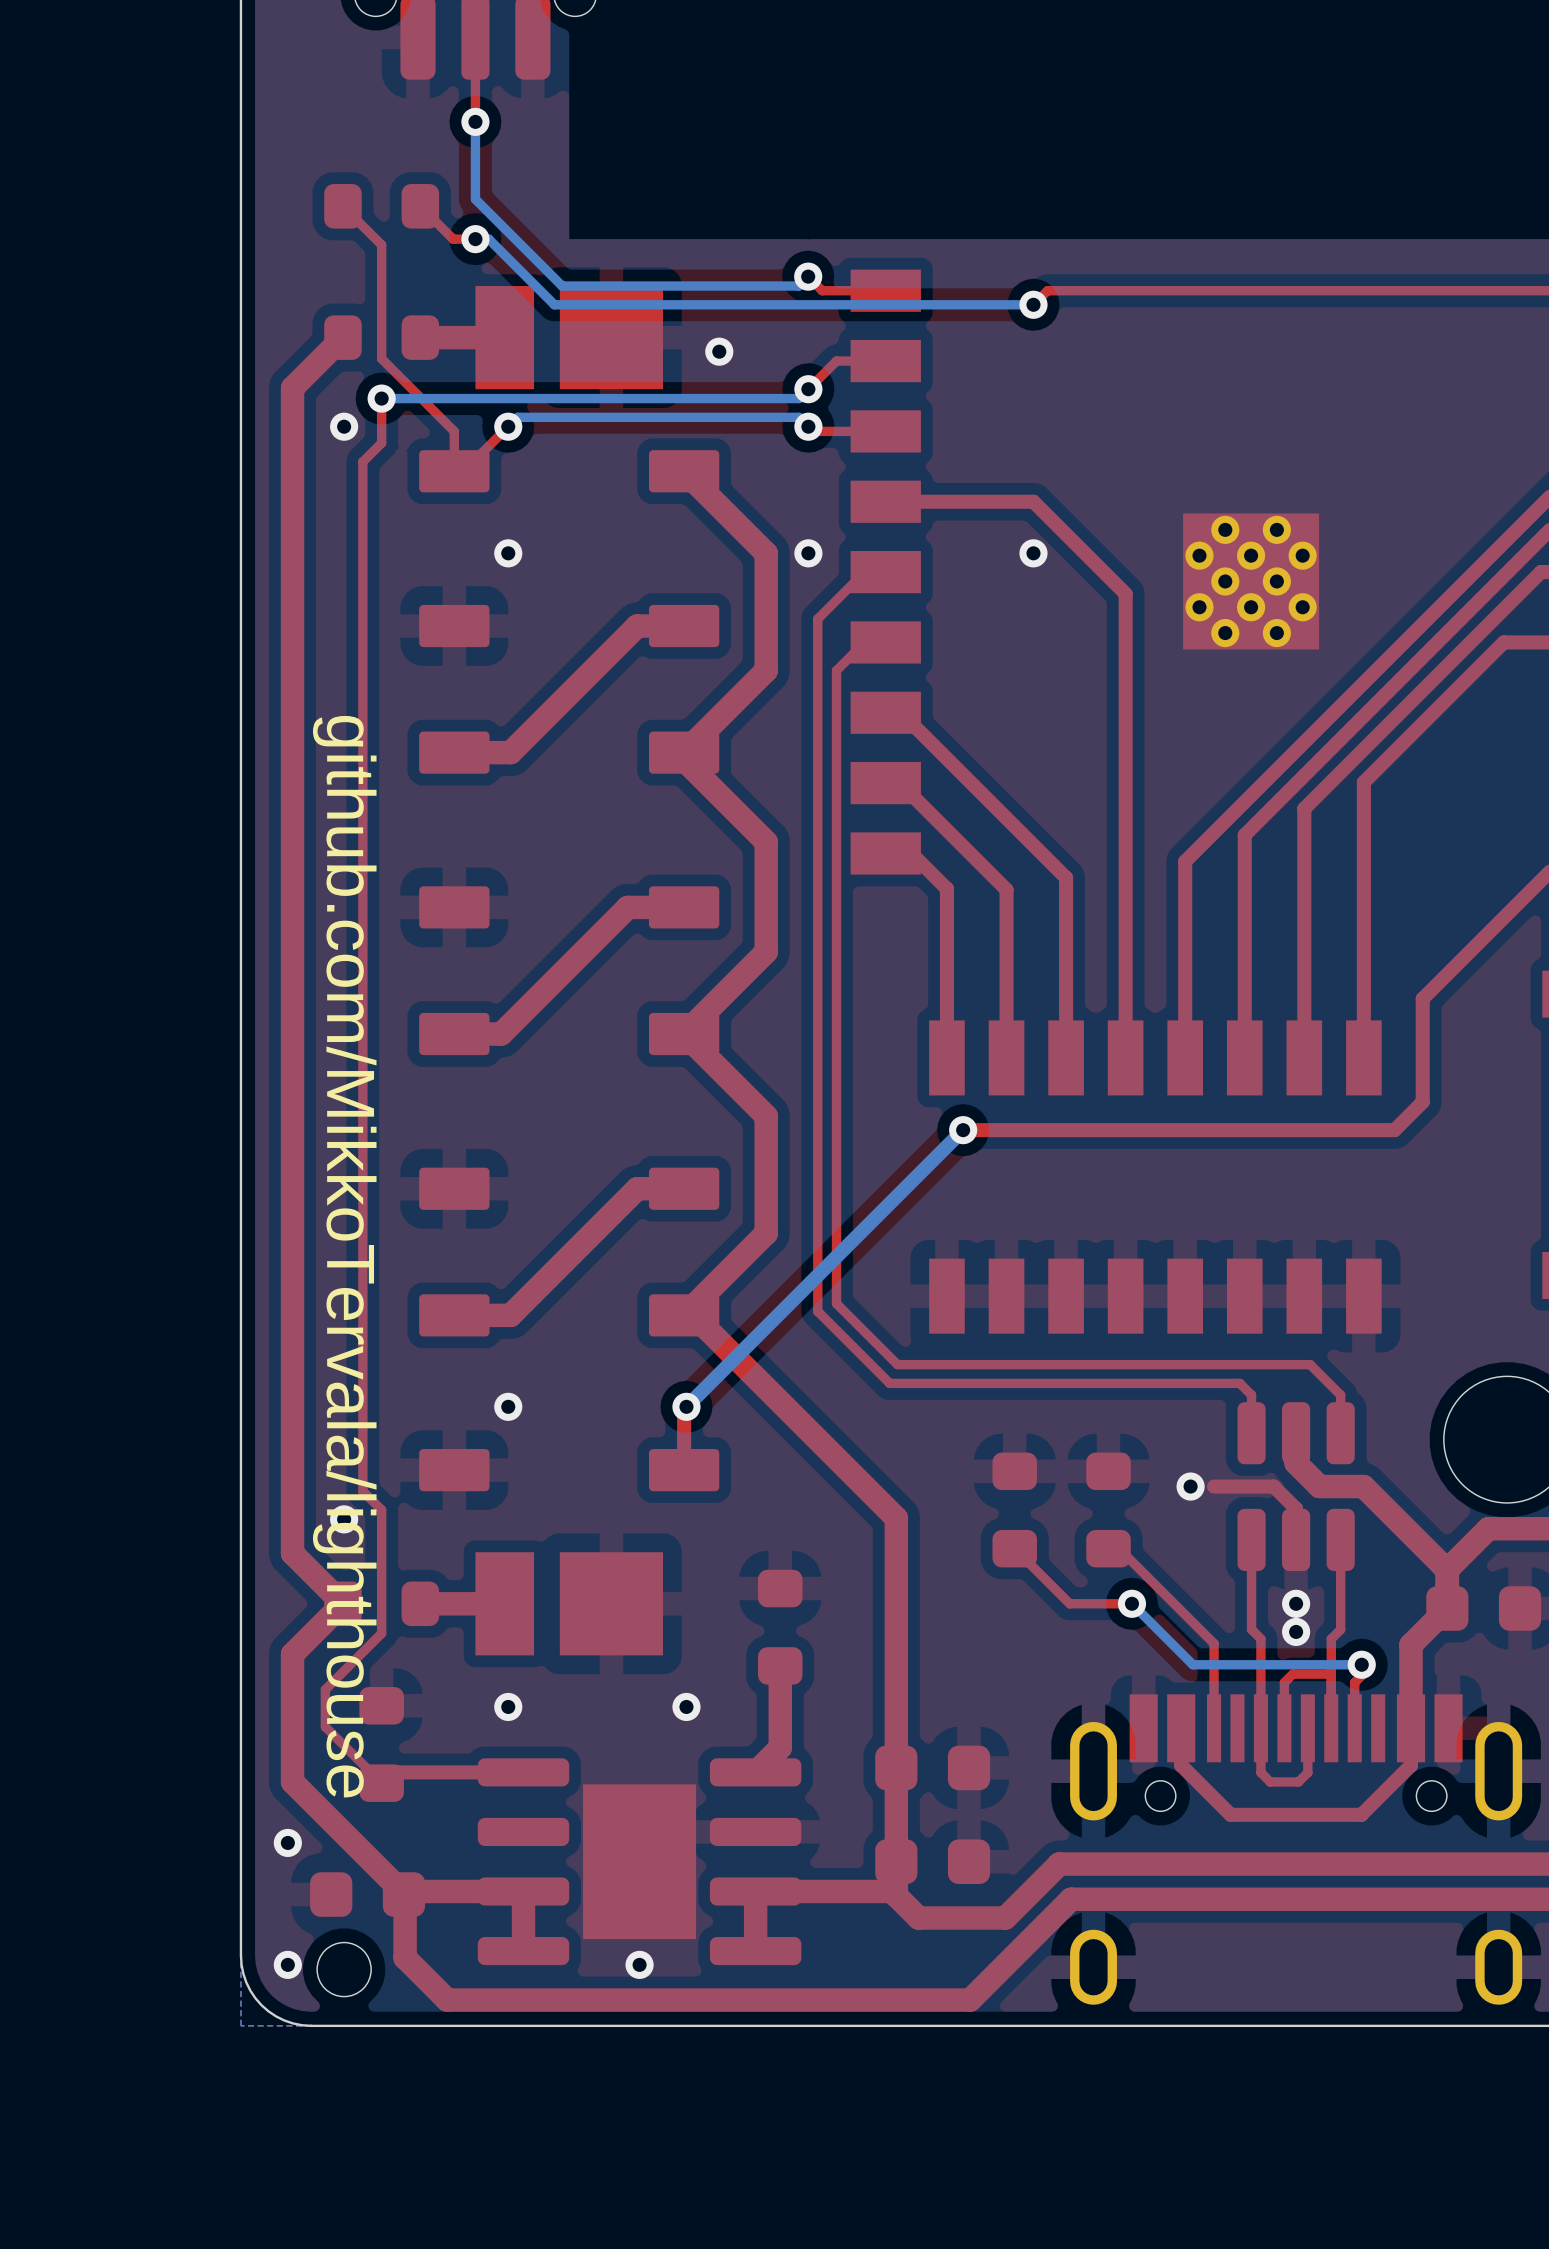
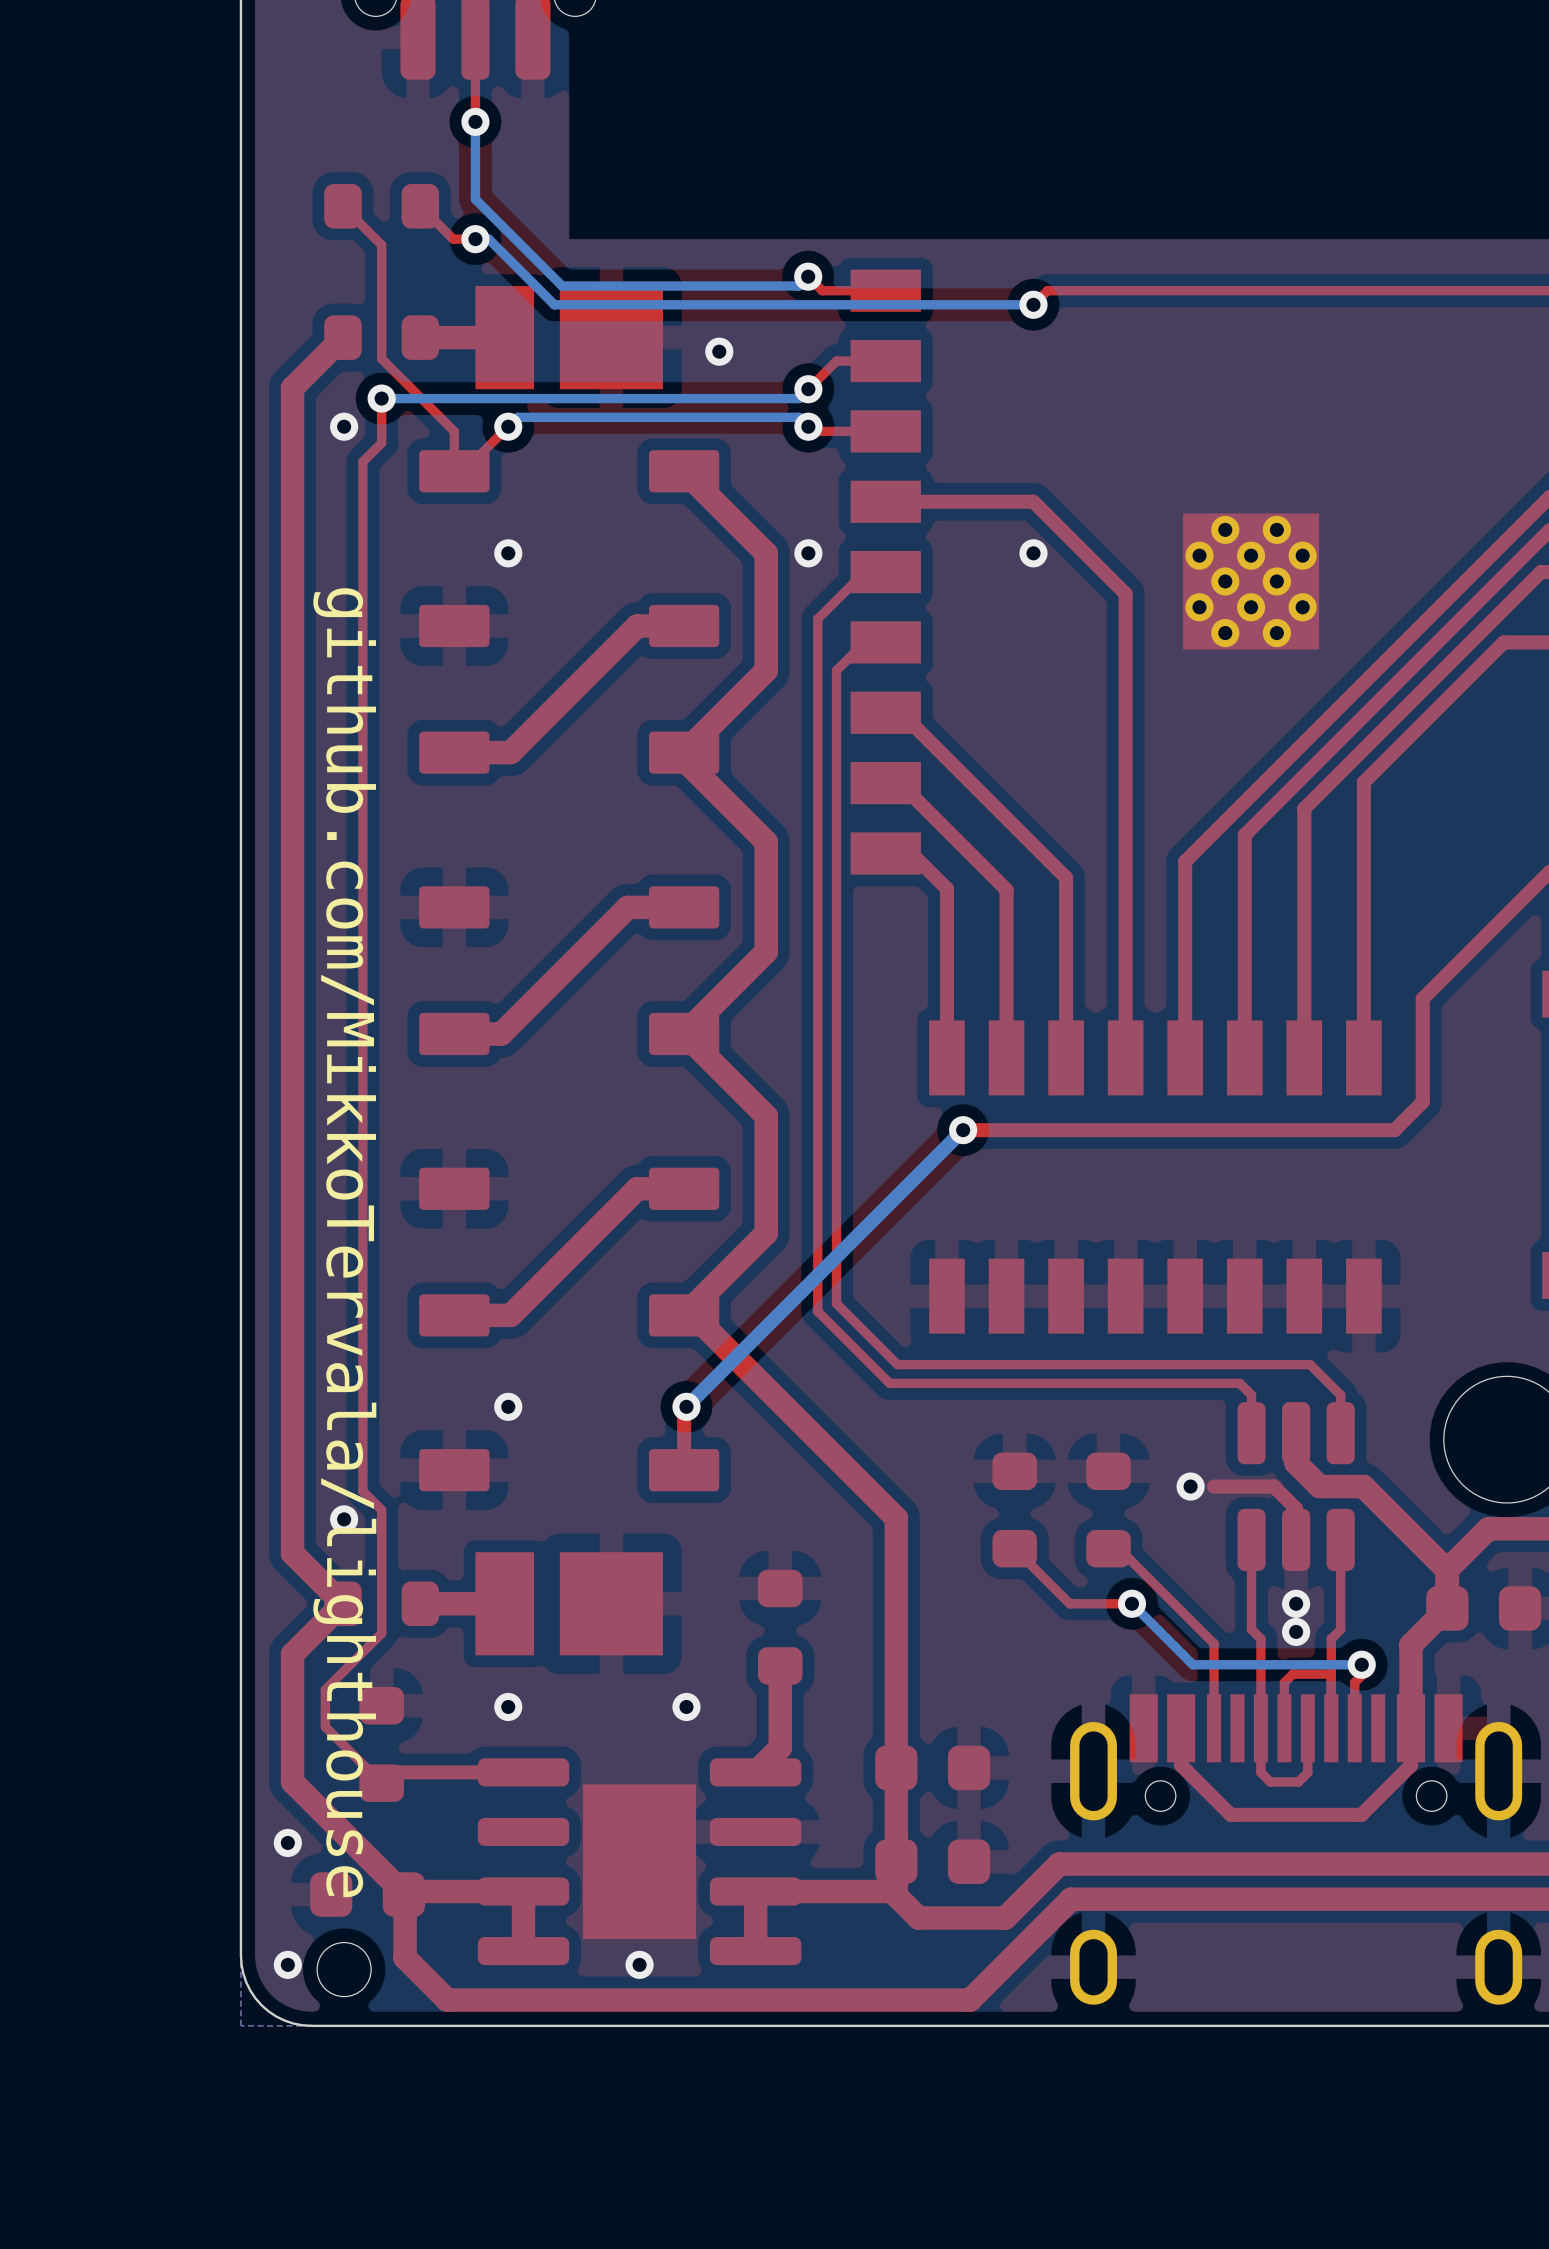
text position: github.com/MikkoTervala/lighthouse (344, 1256) -> github.com/MikkoTervala/lighthouse (344, 1242)

